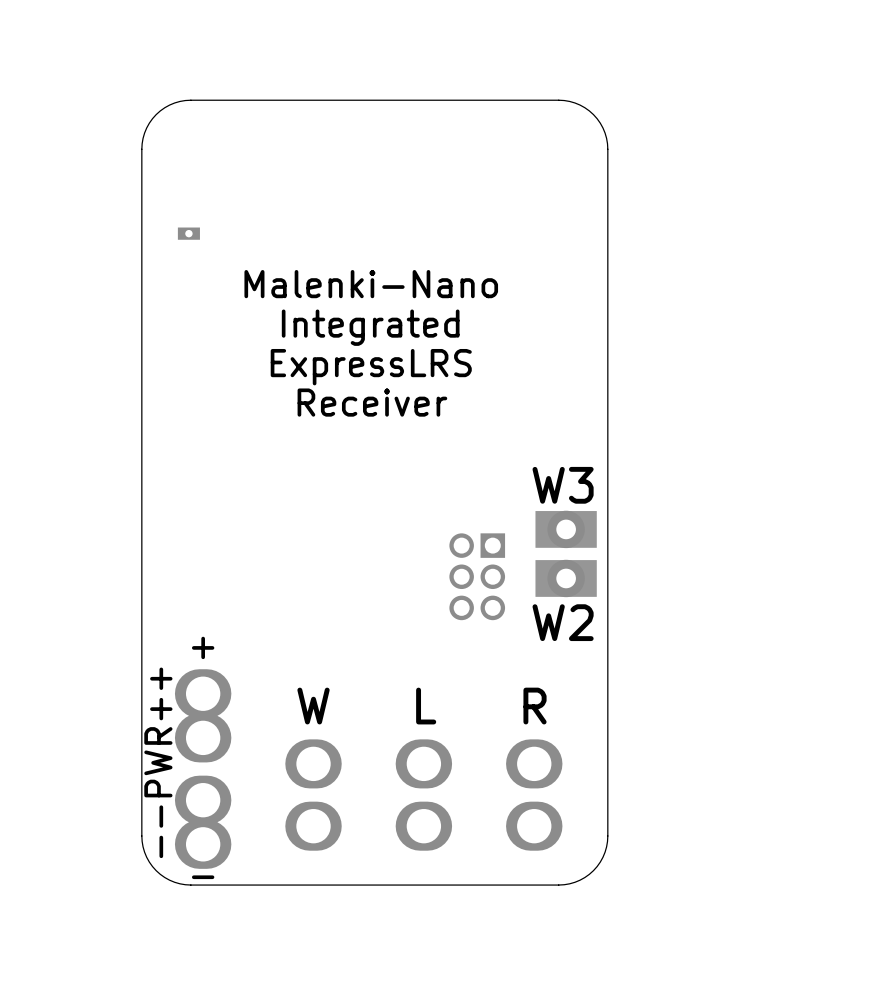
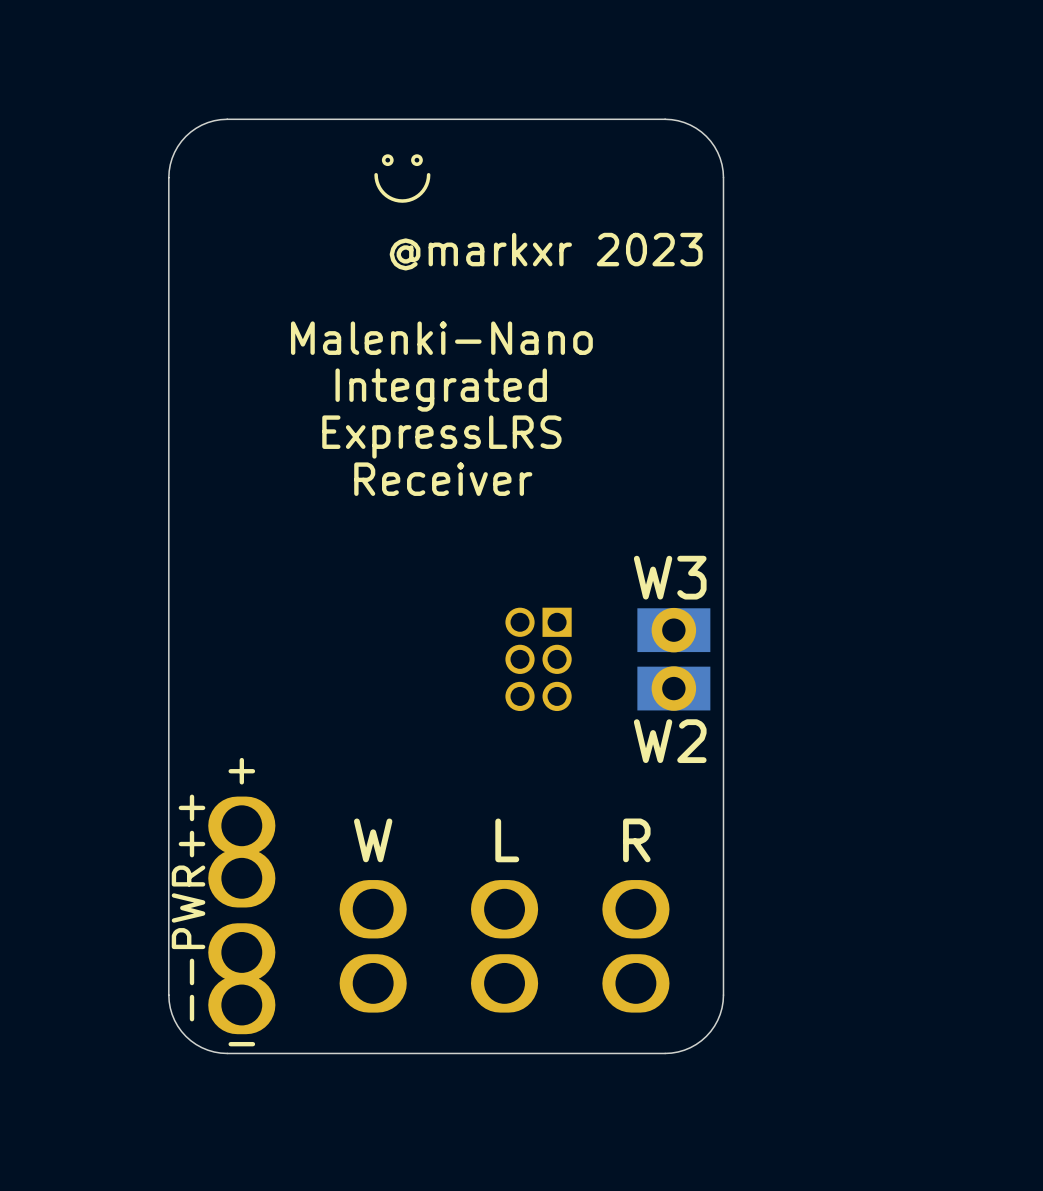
drawing: none -> [381, 154, 423, 167]
line: none -> (428, 174) (426, 184) (420, 193) (412, 199) (402, 201) (392, 199) (383, 193) (378, 184) (376, 174)
text: none -> @markxr 2023 (546, 251)
part: (188, 233) -> none
part position: (477, 576) -> (538, 659)

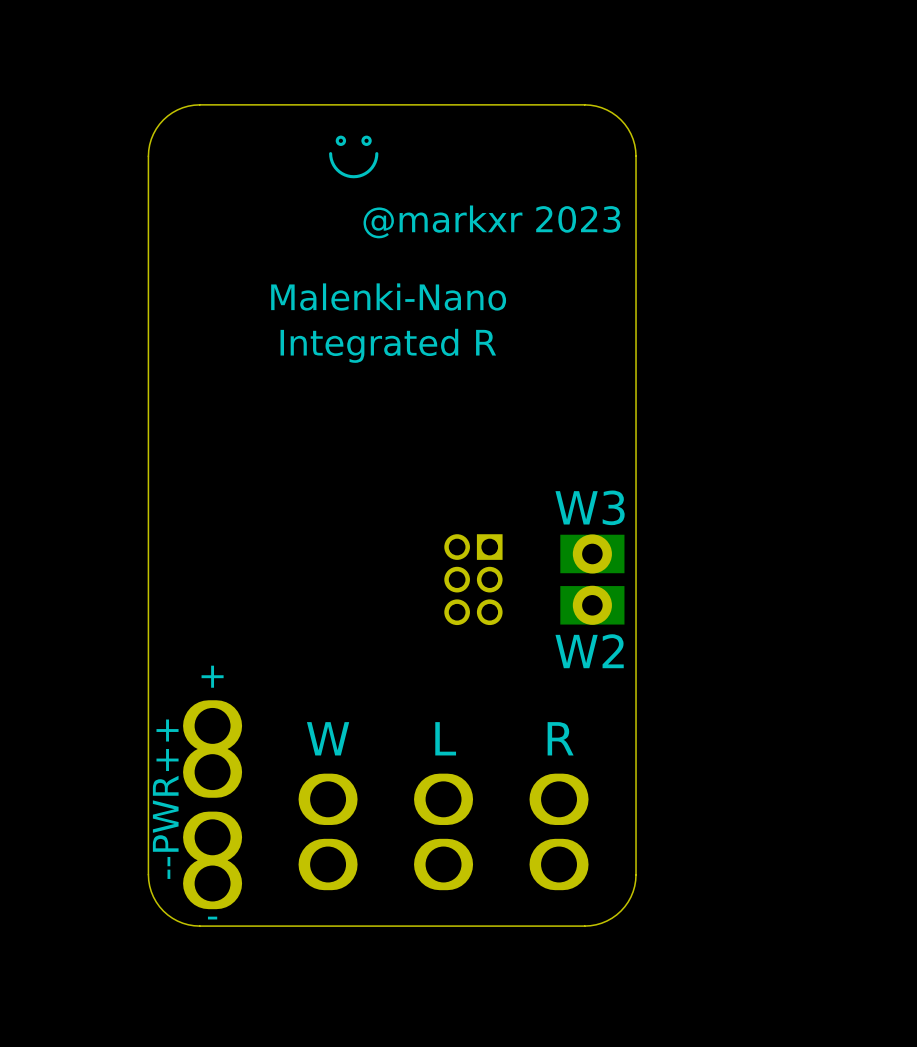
text: Integrated (441, 390) -> Integrated R (388, 345)
text: ExpressLRS (441, 437) -> none
text: Receiver (443, 479) -> none

